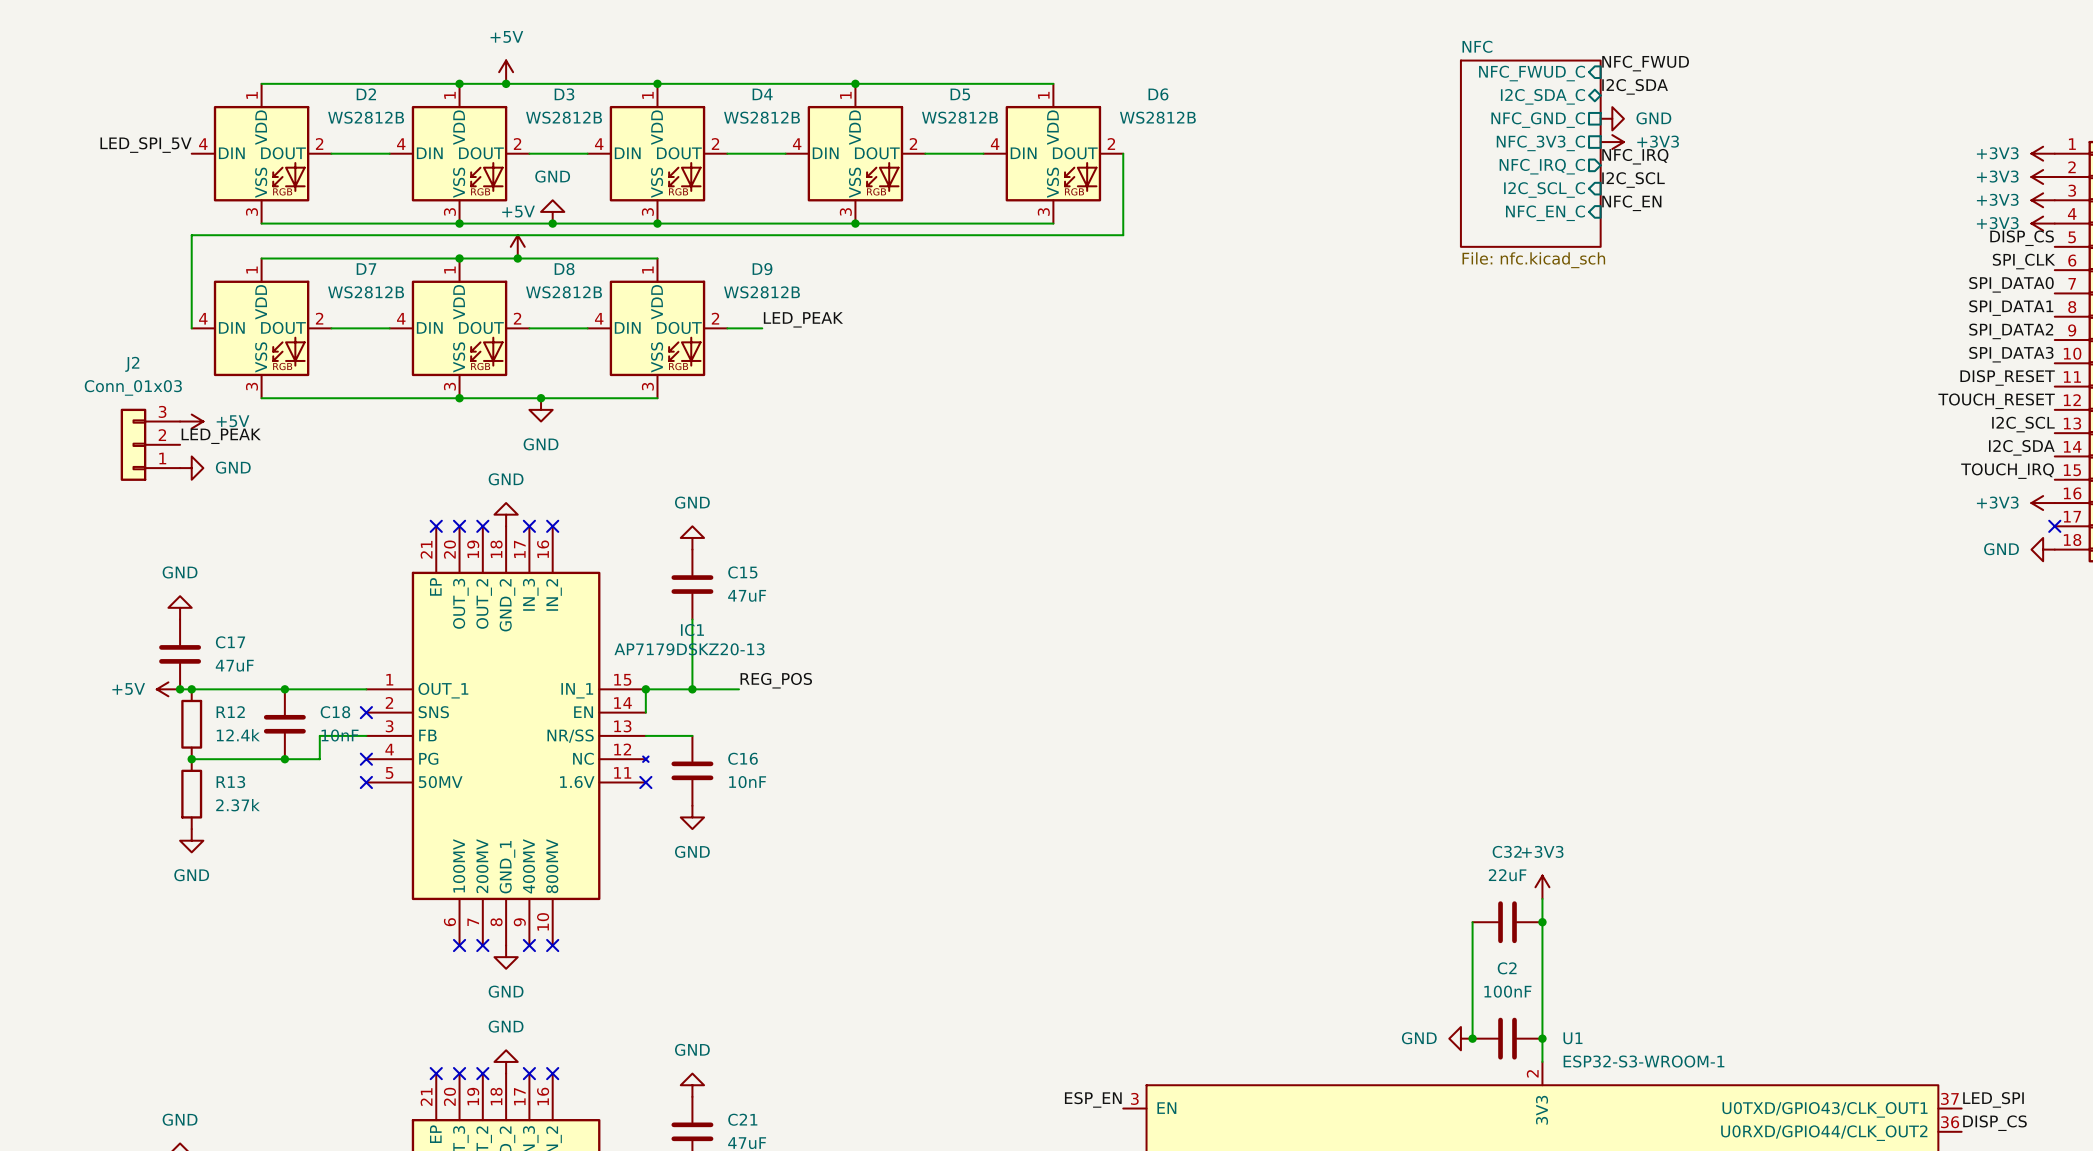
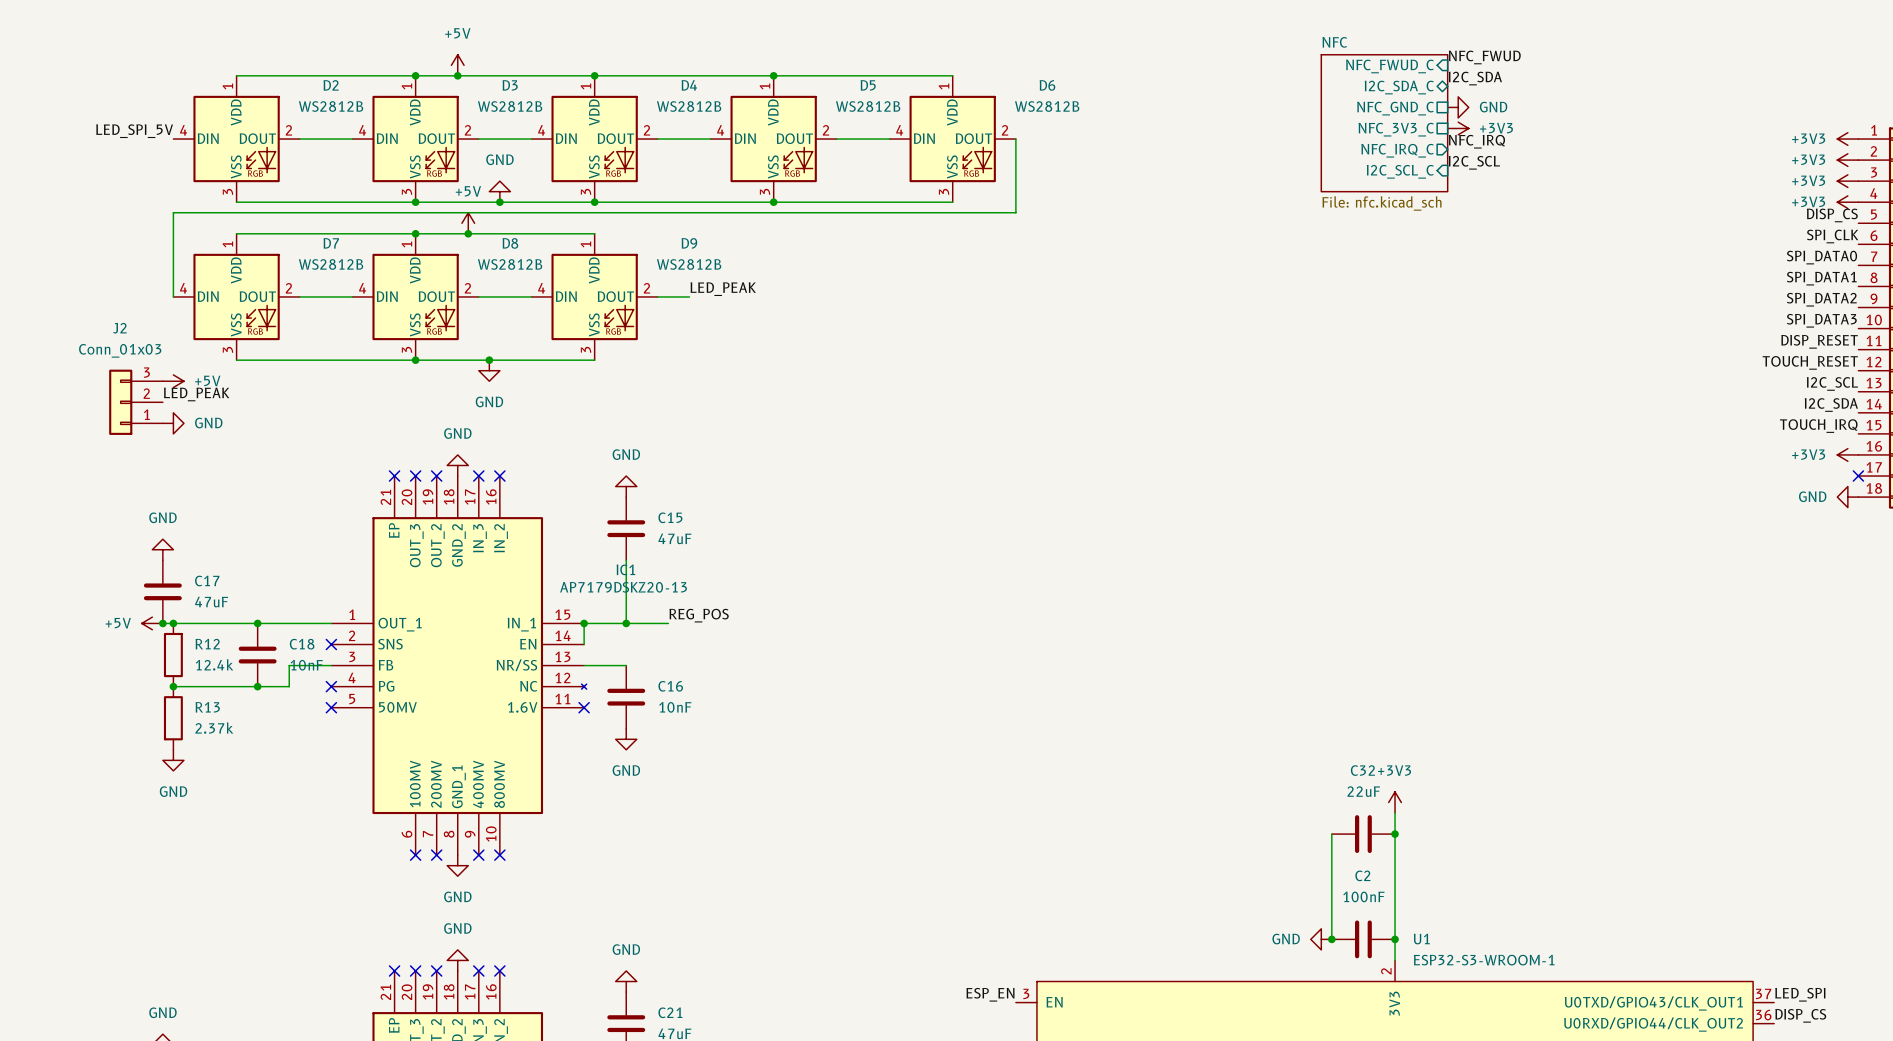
sheet NFC: none -> File: nfc.kicad_sch (1384, 123)
sheet NFC: File: nfc.kicad_sch (1530, 153) -> none
label: NFC_EN (1631, 203) -> none
sheet pin: NFC_EN_C (1545, 213) -> none

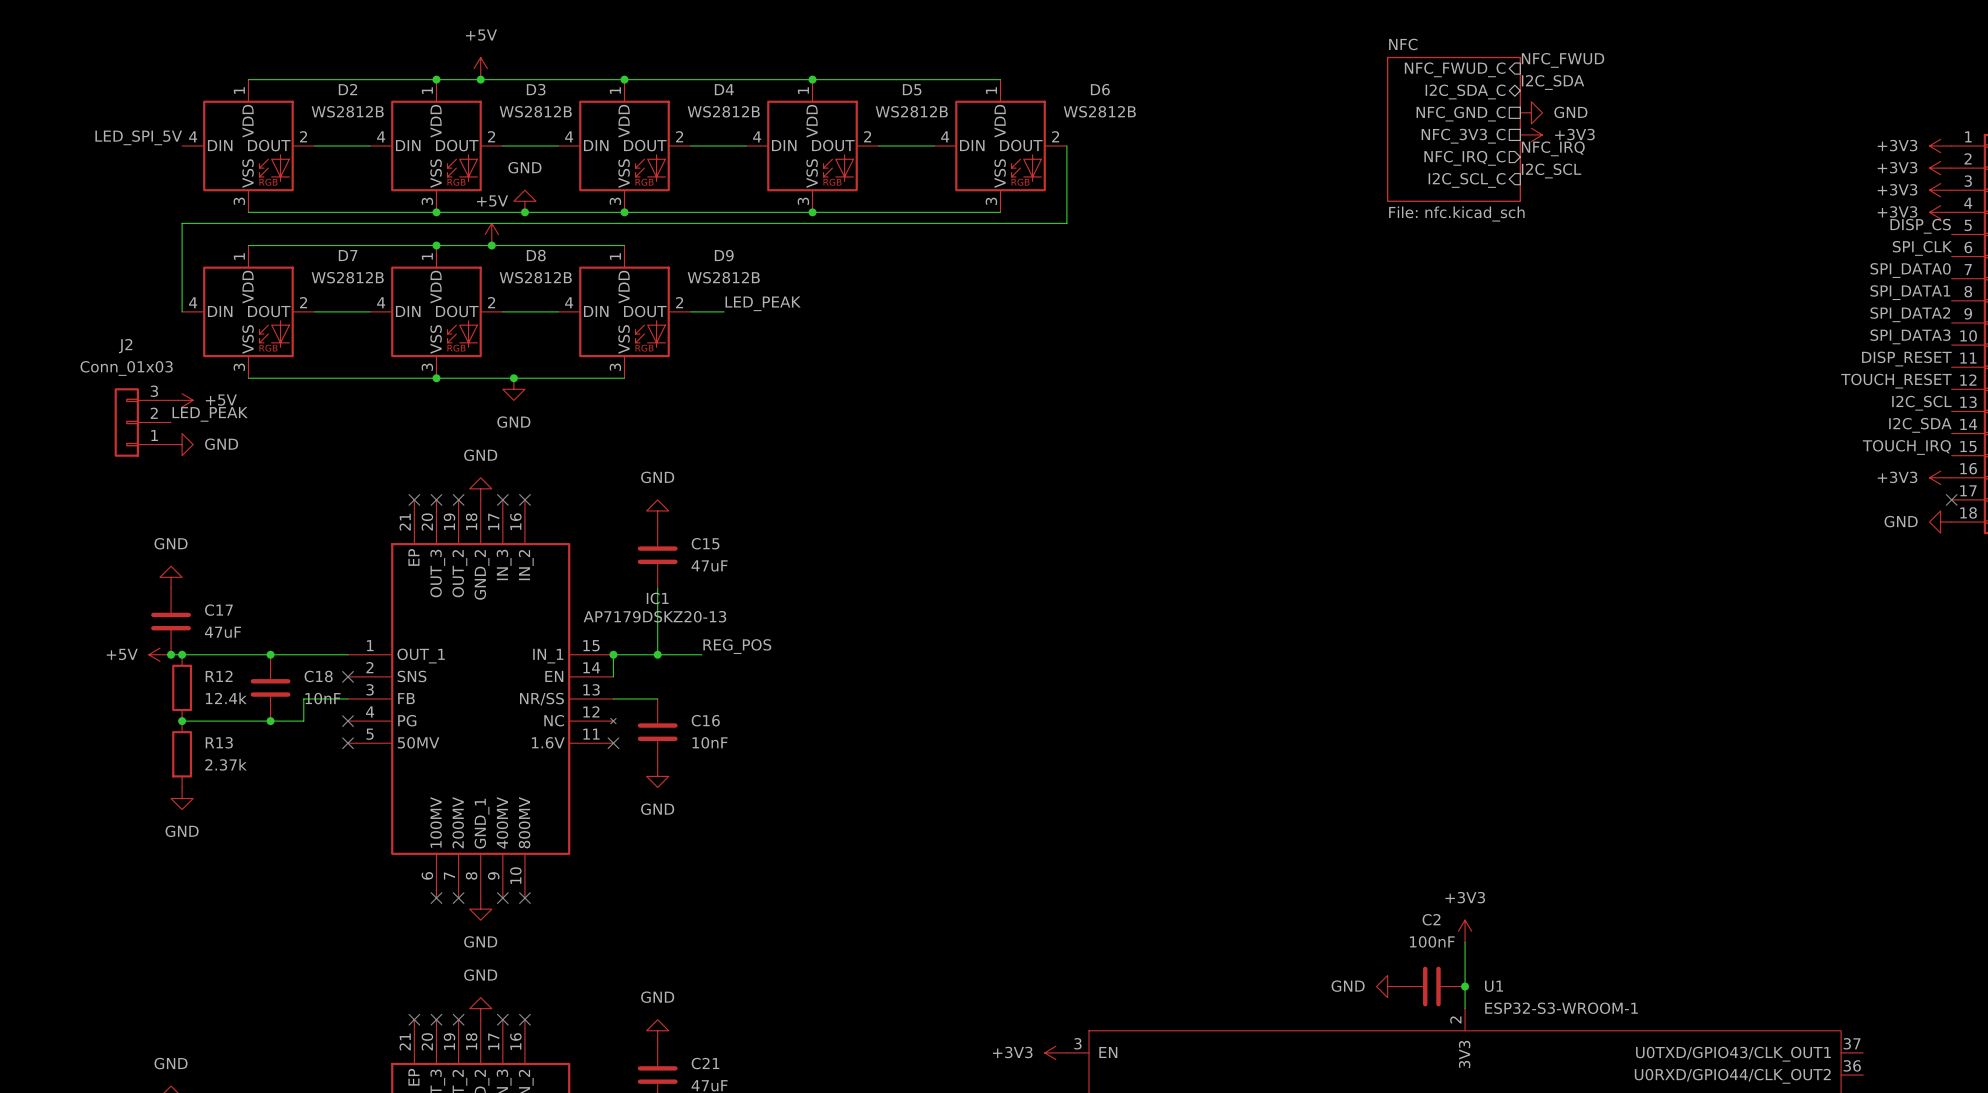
power symbol position: +3V3 (1395, 802) -> +3V3 (1465, 931)
wire: (1395, 813) (1395, 897) -> none
wire: (1331, 834) (1331, 939) -> none
C32: 22uF (1363, 834) -> none
junction: (1395, 834) -> none
junction: (1331, 939) -> none
label: ESP_EN (990, 994) -> none
label: LED_SPI (1800, 994) -> none
power symbol: none -> +3V3 (1055, 1052)
label: DISP_CS (1800, 1015) -> none

